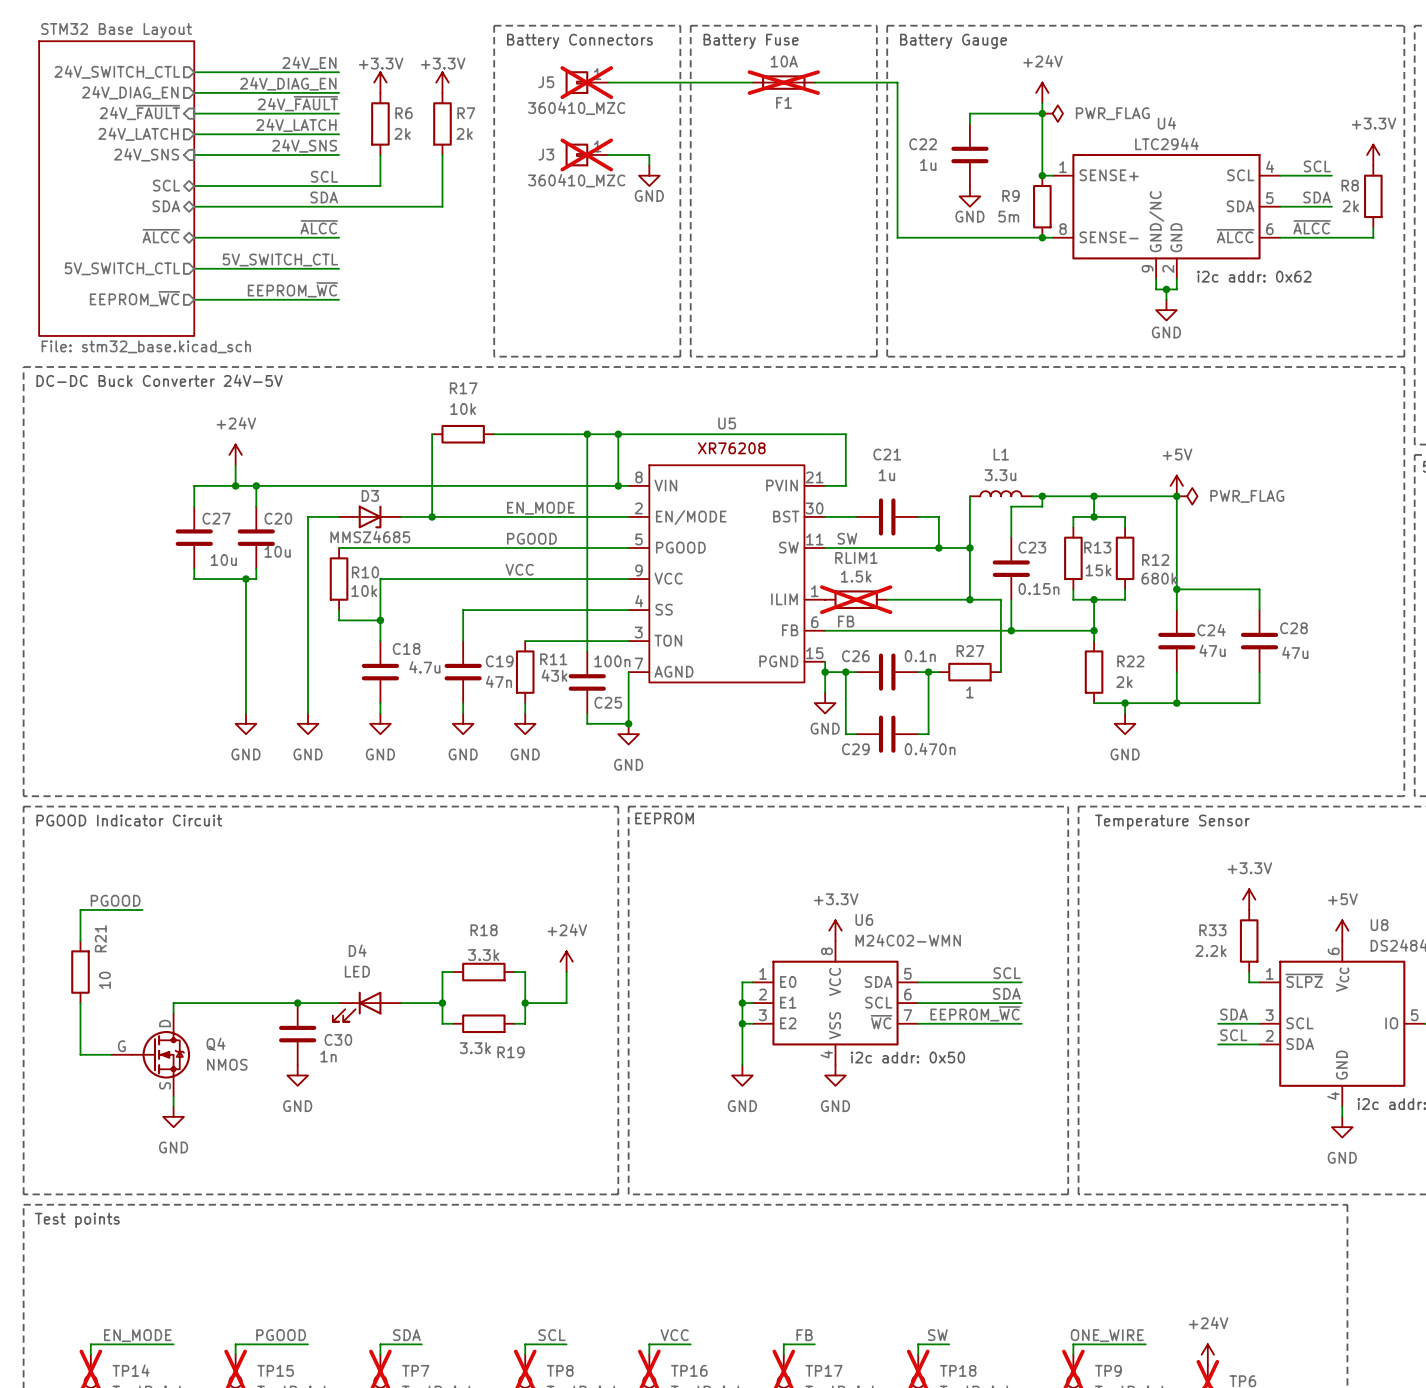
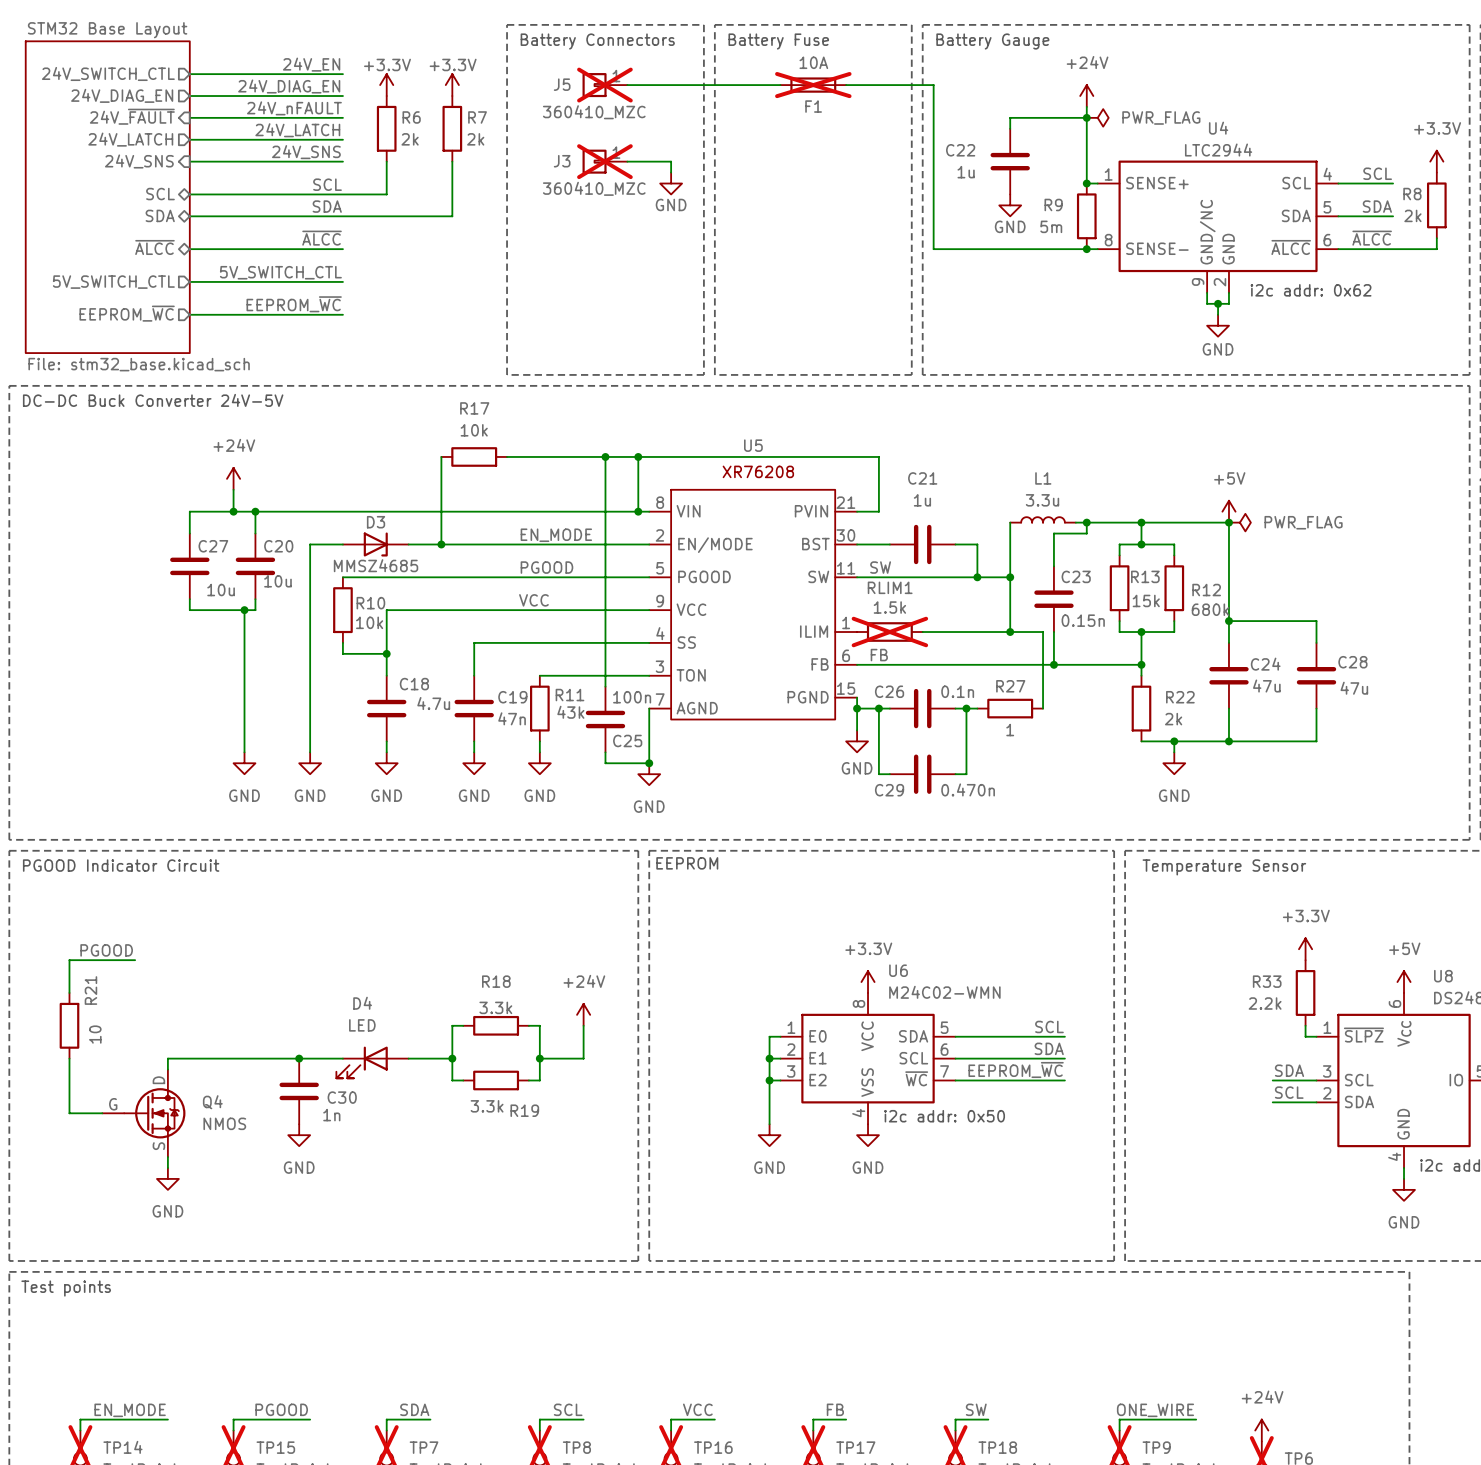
label: 24V_~{FAULT} (297, 103) -> 24V_nFAULT (294, 108)

